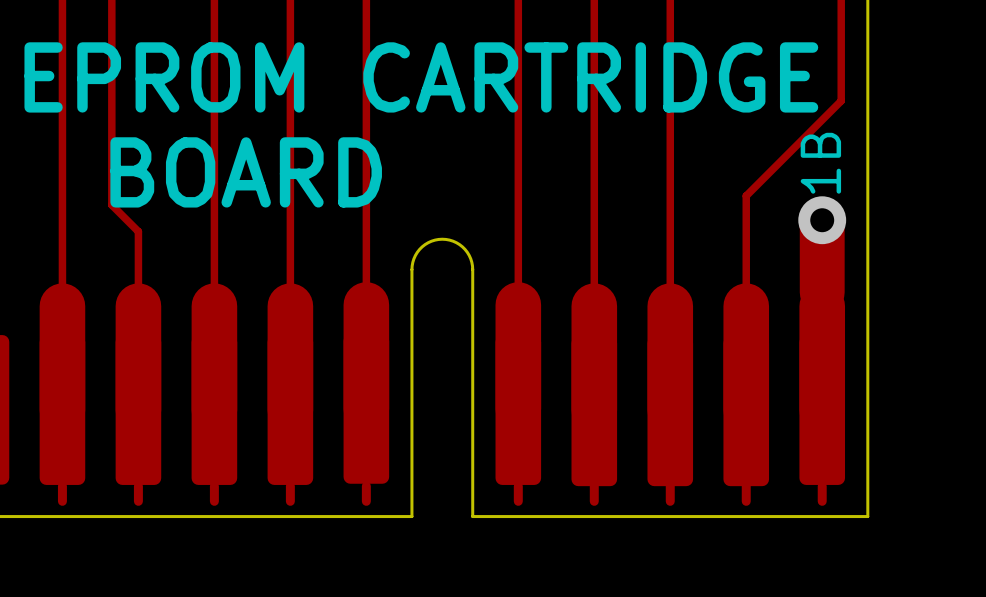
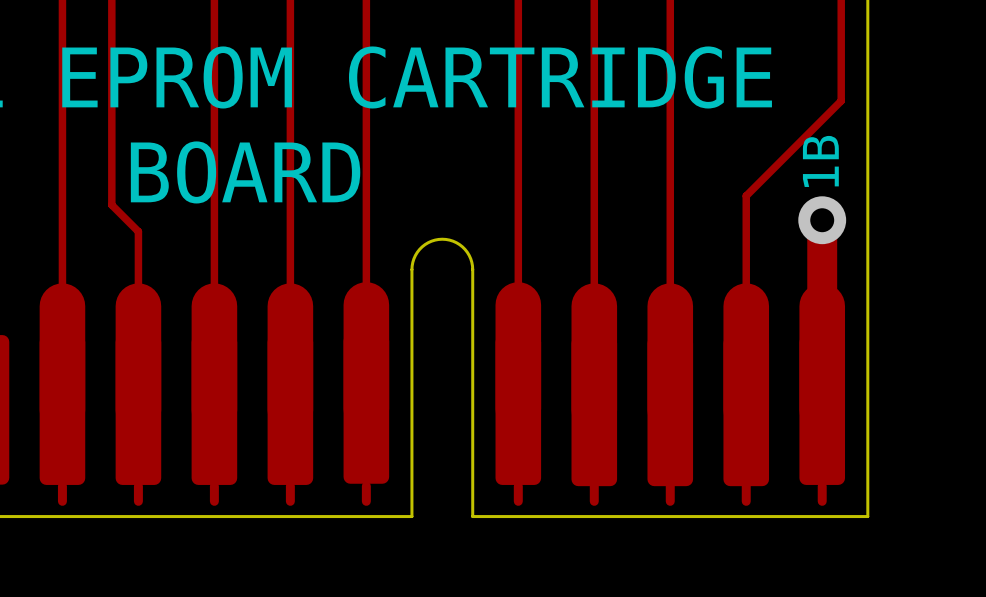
track width: thick (822, 220) (822, 292) -> thin (822, 220) (822, 292)

